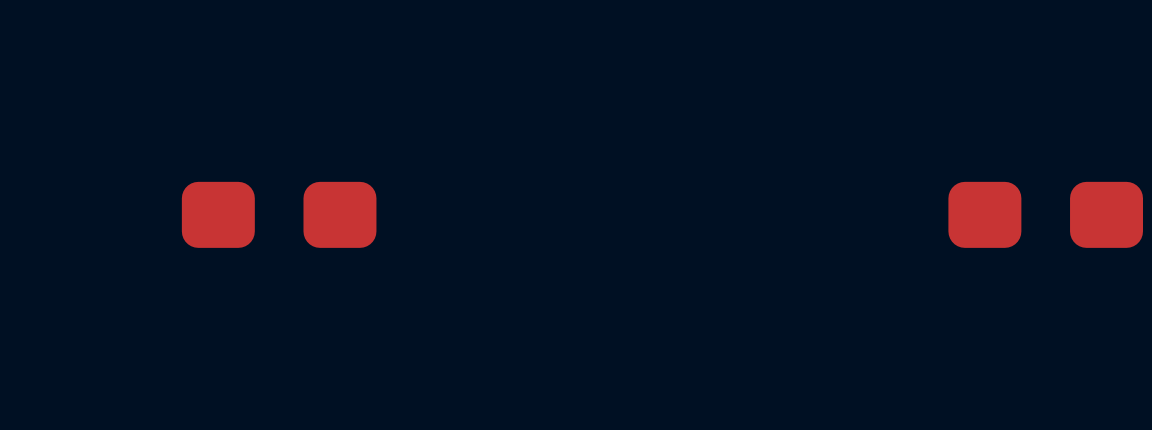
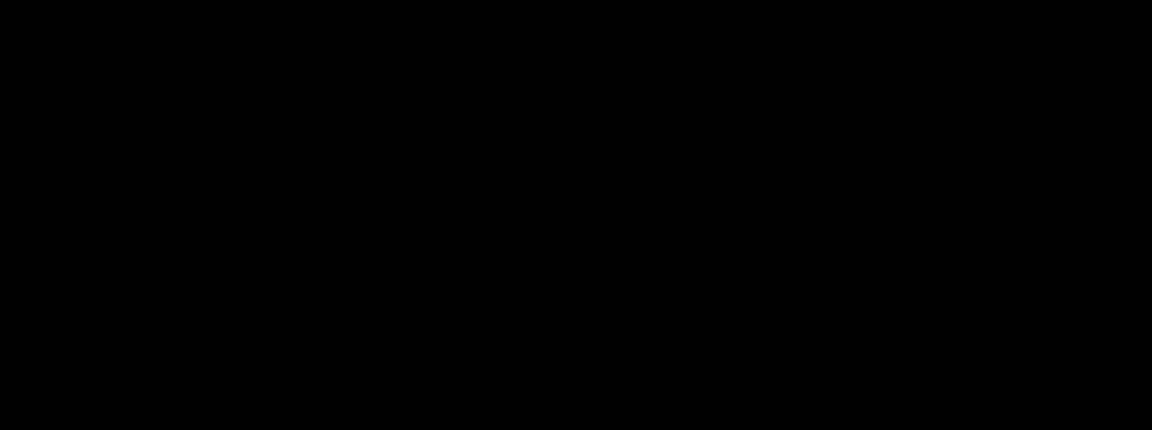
part: (279, 214) -> none
part: (1045, 214) -> none

